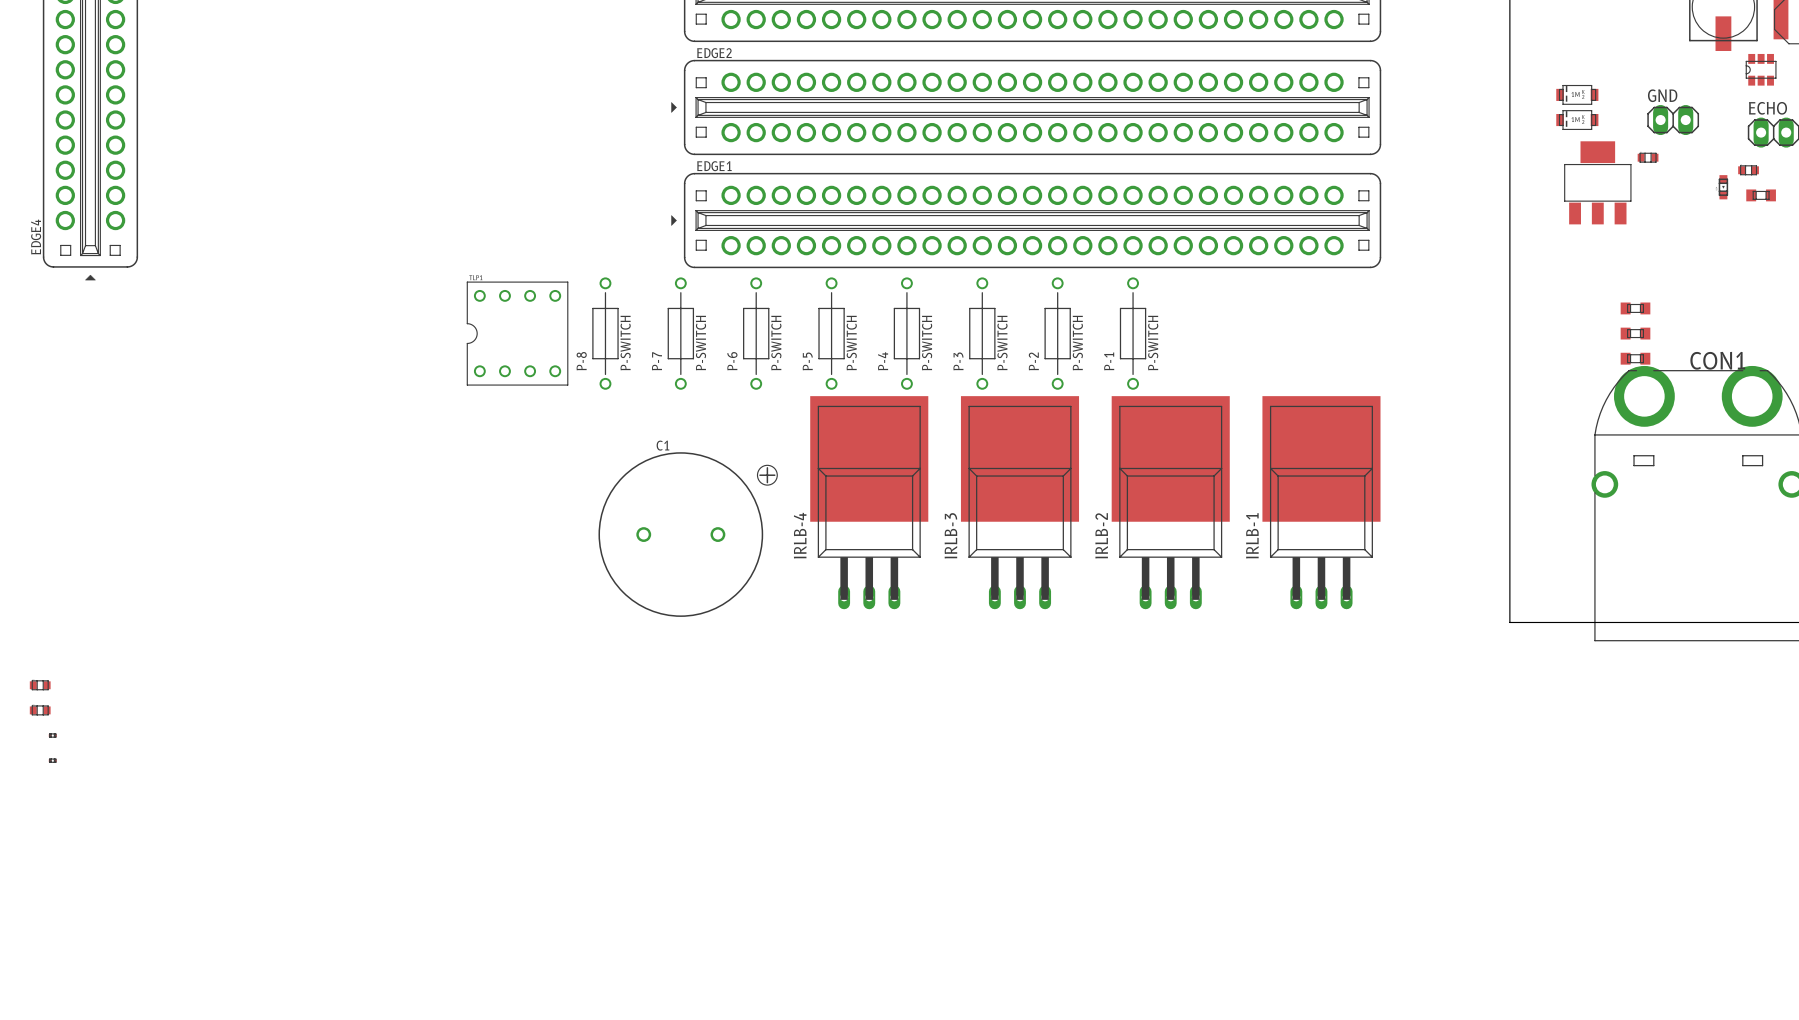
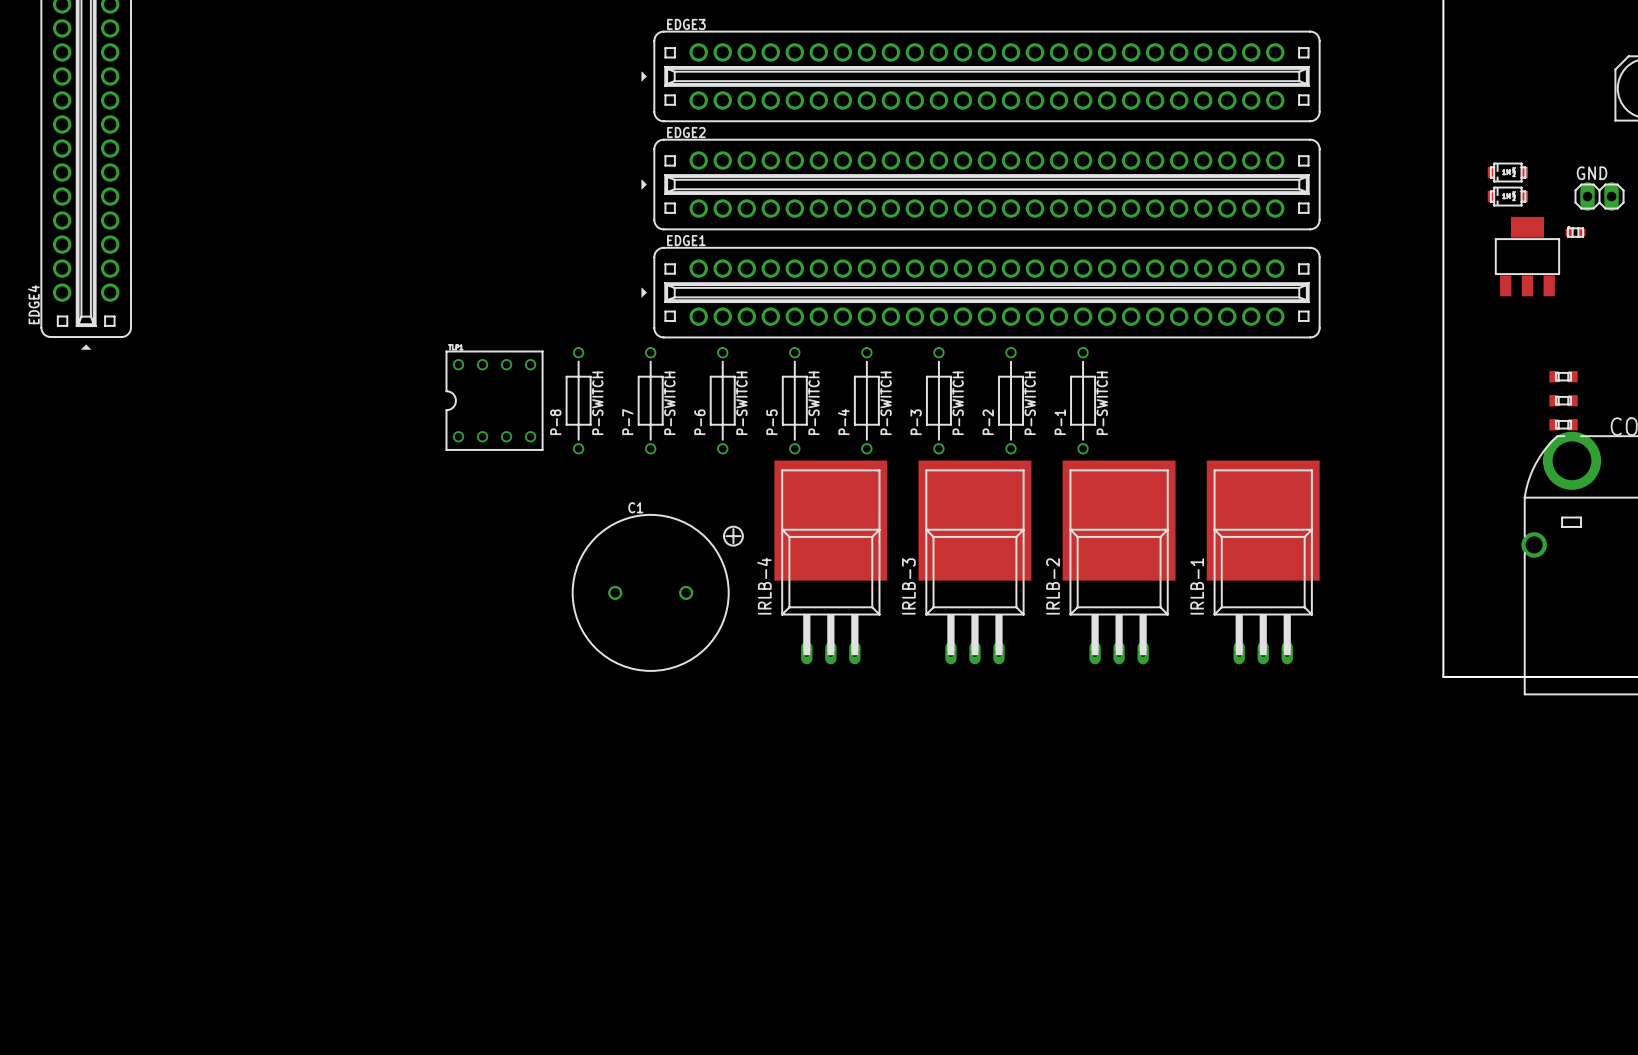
part: (40, 685) -> none
part: (40, 710) -> none
part: (52, 735) -> none
part: (52, 760) -> none

